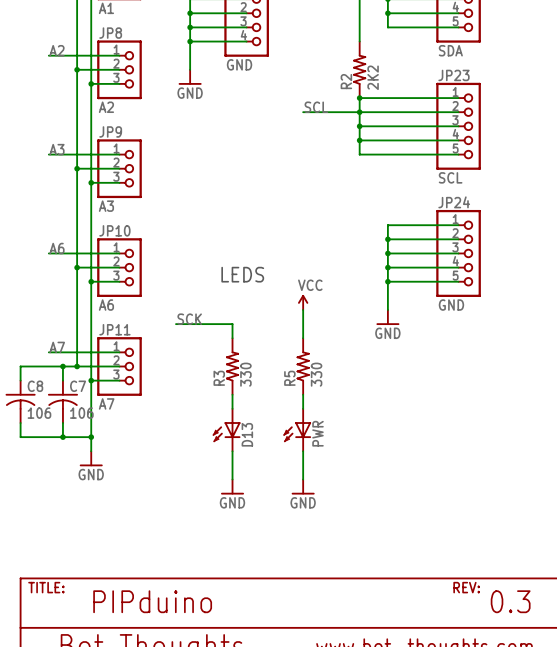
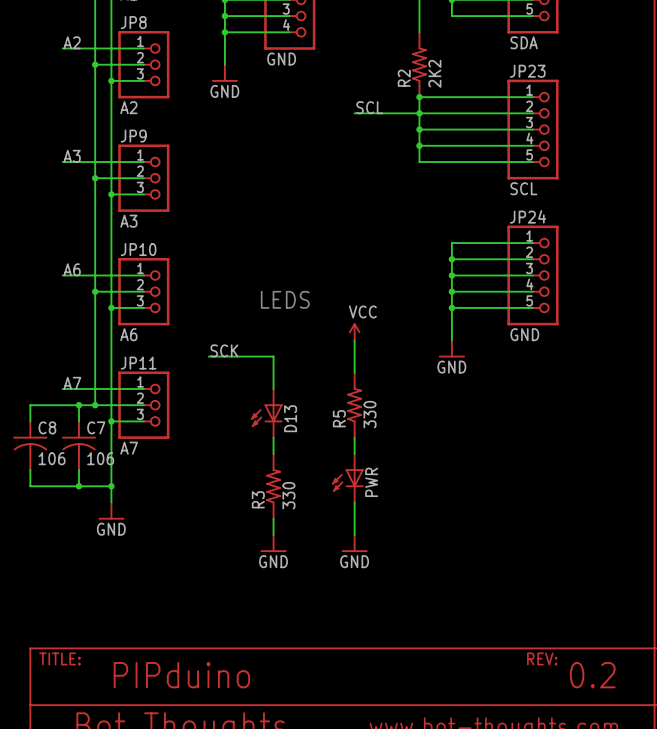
R3 position: (232, 366) -> (273, 486)
D13 position: (226, 430) -> (266, 413)
text: 0.3 (510, 601) -> 0.2 (592, 675)

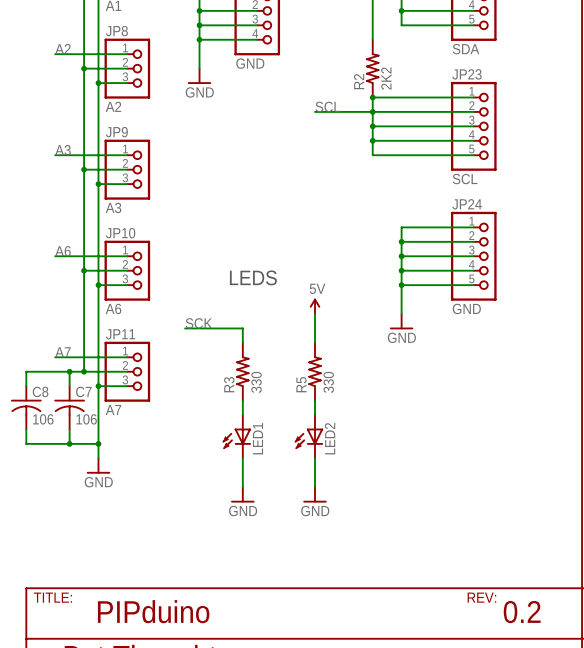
power symbol: VCC (354, 331) -> 5V (315, 306)
D13: (266, 413) -> none
LED1: none -> (236, 436)
PWR name: PWR (371, 482) -> LED2 (330, 438)
R3 position: (273, 486) -> (242, 371)

